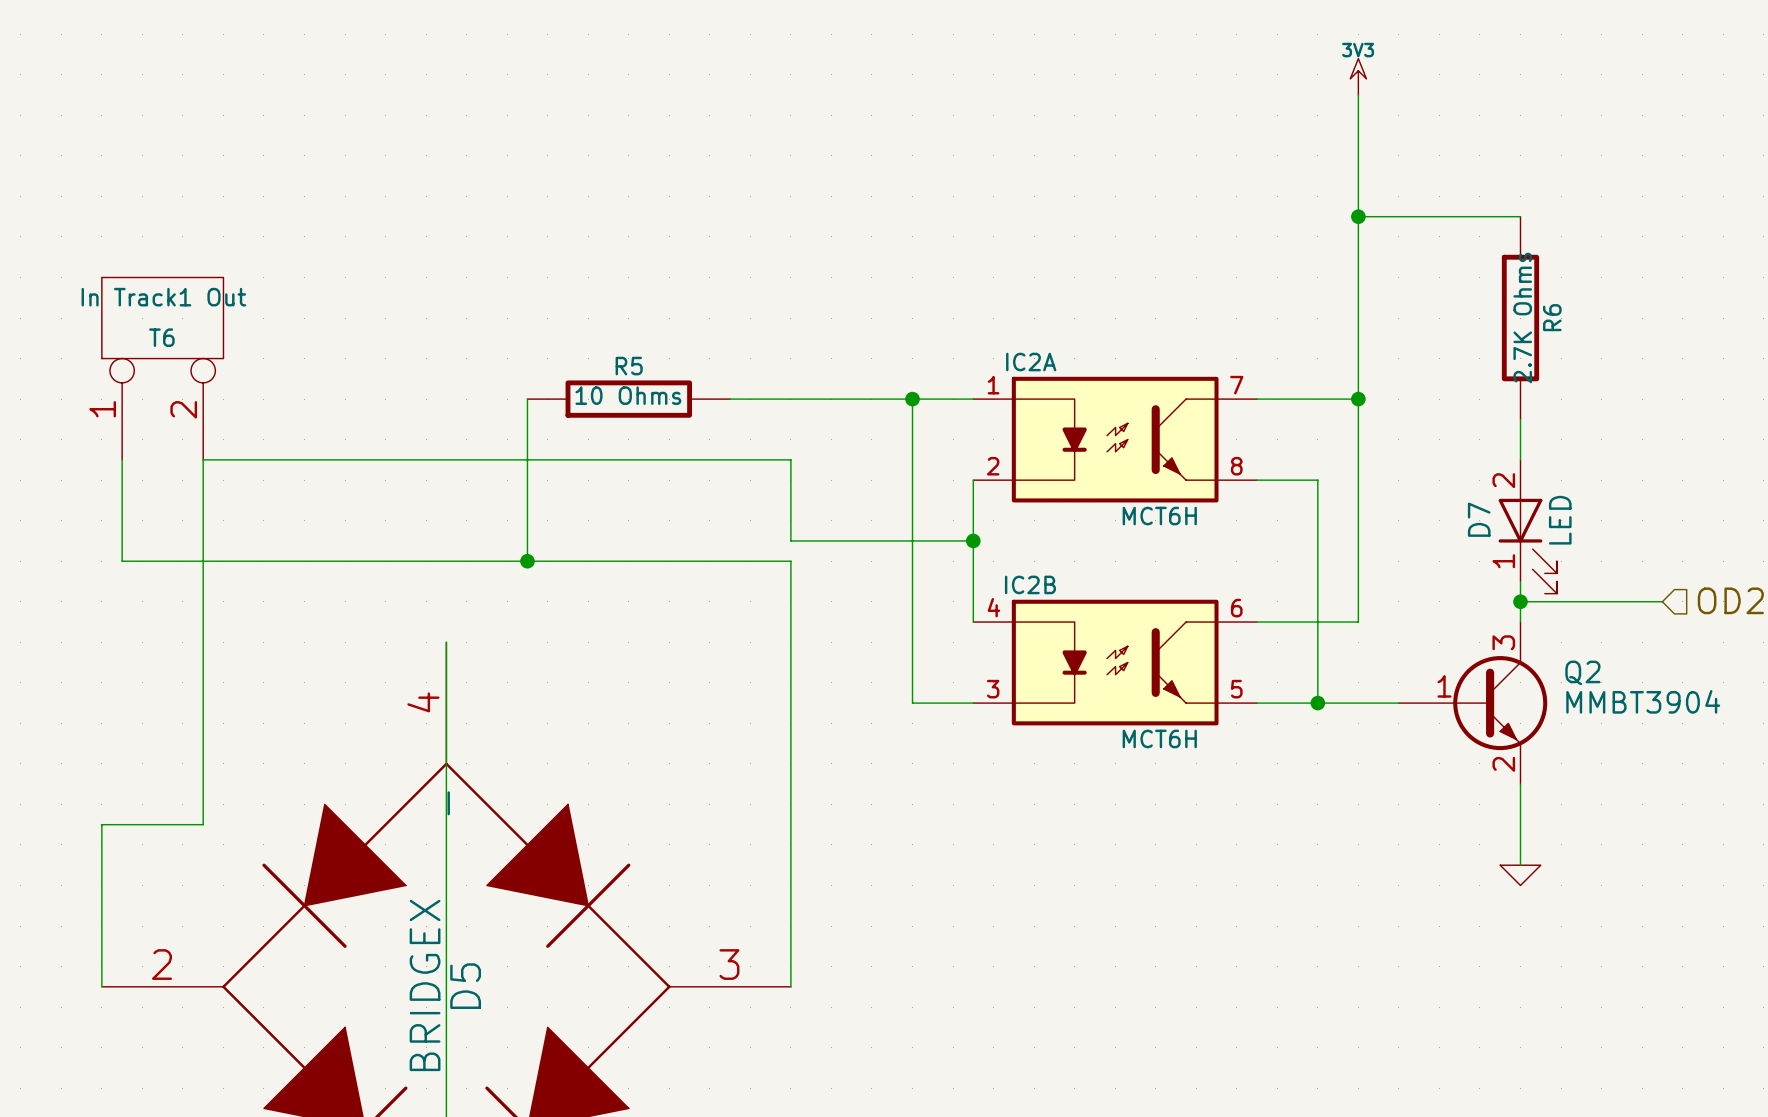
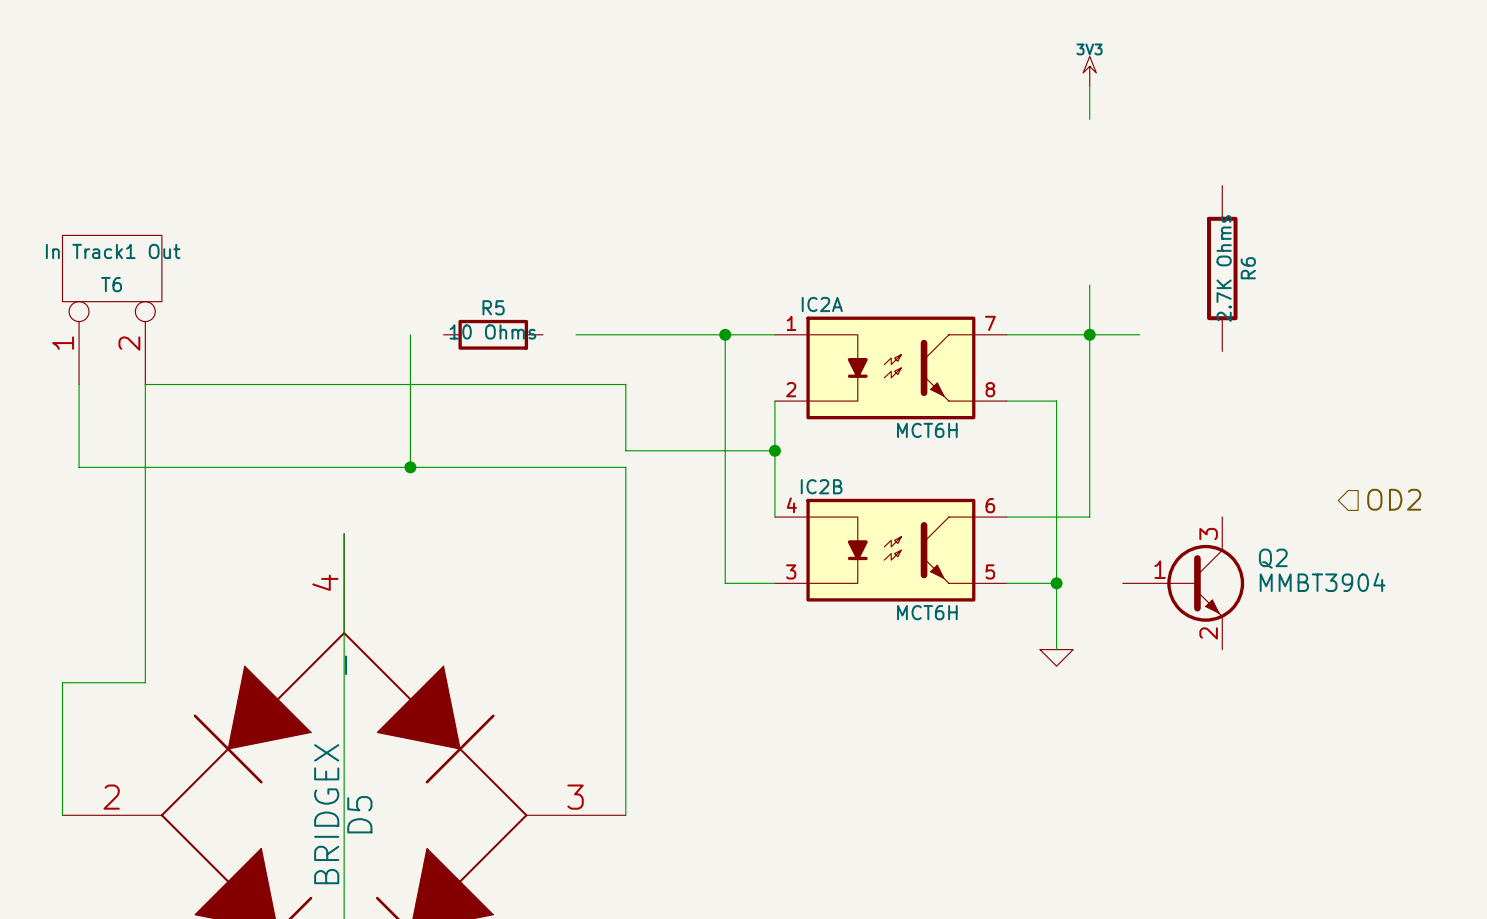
wire: (1358, 135) (1358, 338) -> none
wire: (1358, 216) (1520, 216) -> none
junction: (1358, 216) -> none
R5 symbol: [527, 380, 731, 418] -> [443, 319, 543, 350]
wire: none -> (1089, 334) (1139, 334)
wire: (1520, 419) (1520, 459) -> none
D7: LED (1527, 526) -> none
wire: (1520, 581) (1520, 622) -> none
wire: (1520, 601) (1662, 601) -> none
junction: (1520, 601) -> none
wire: (1317, 703) (1398, 703) -> (1056, 583) (1056, 649)
wire: (1520, 784) (1520, 865) -> none
power symbol position: (1520, 875) -> (1056, 657)

